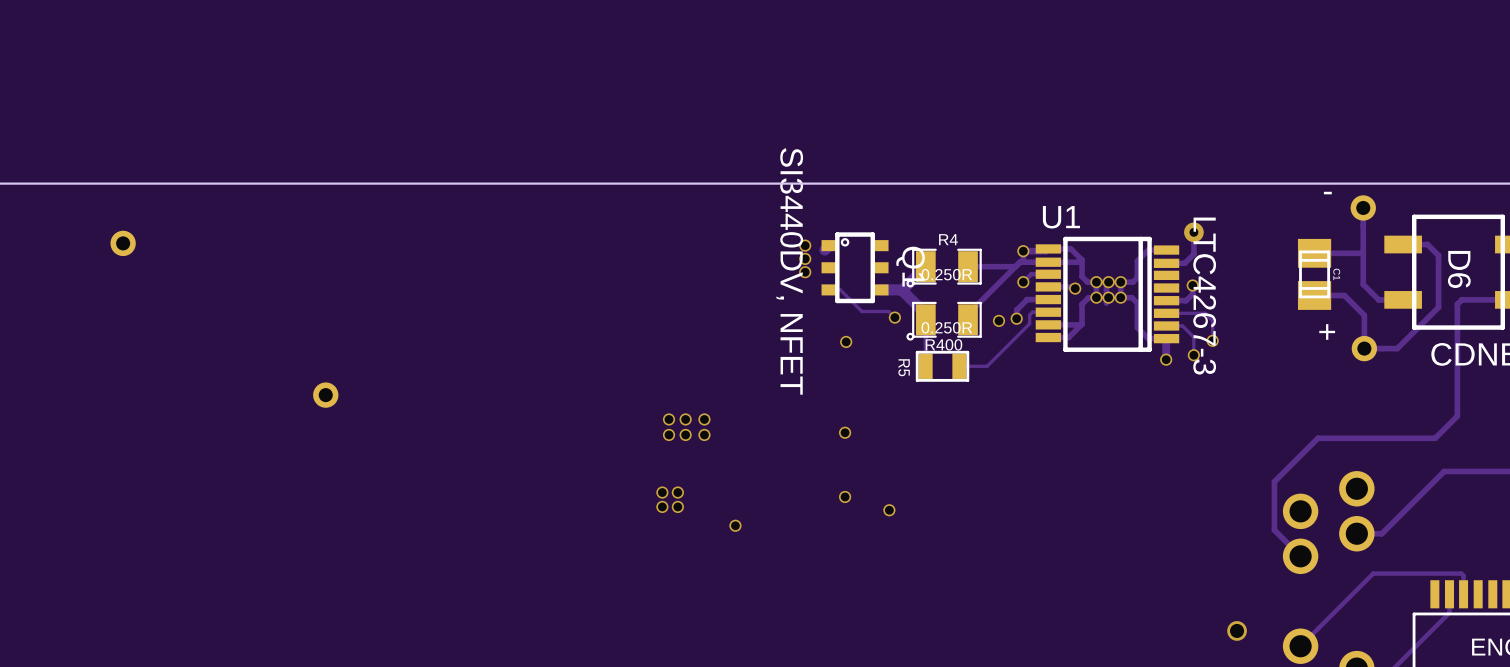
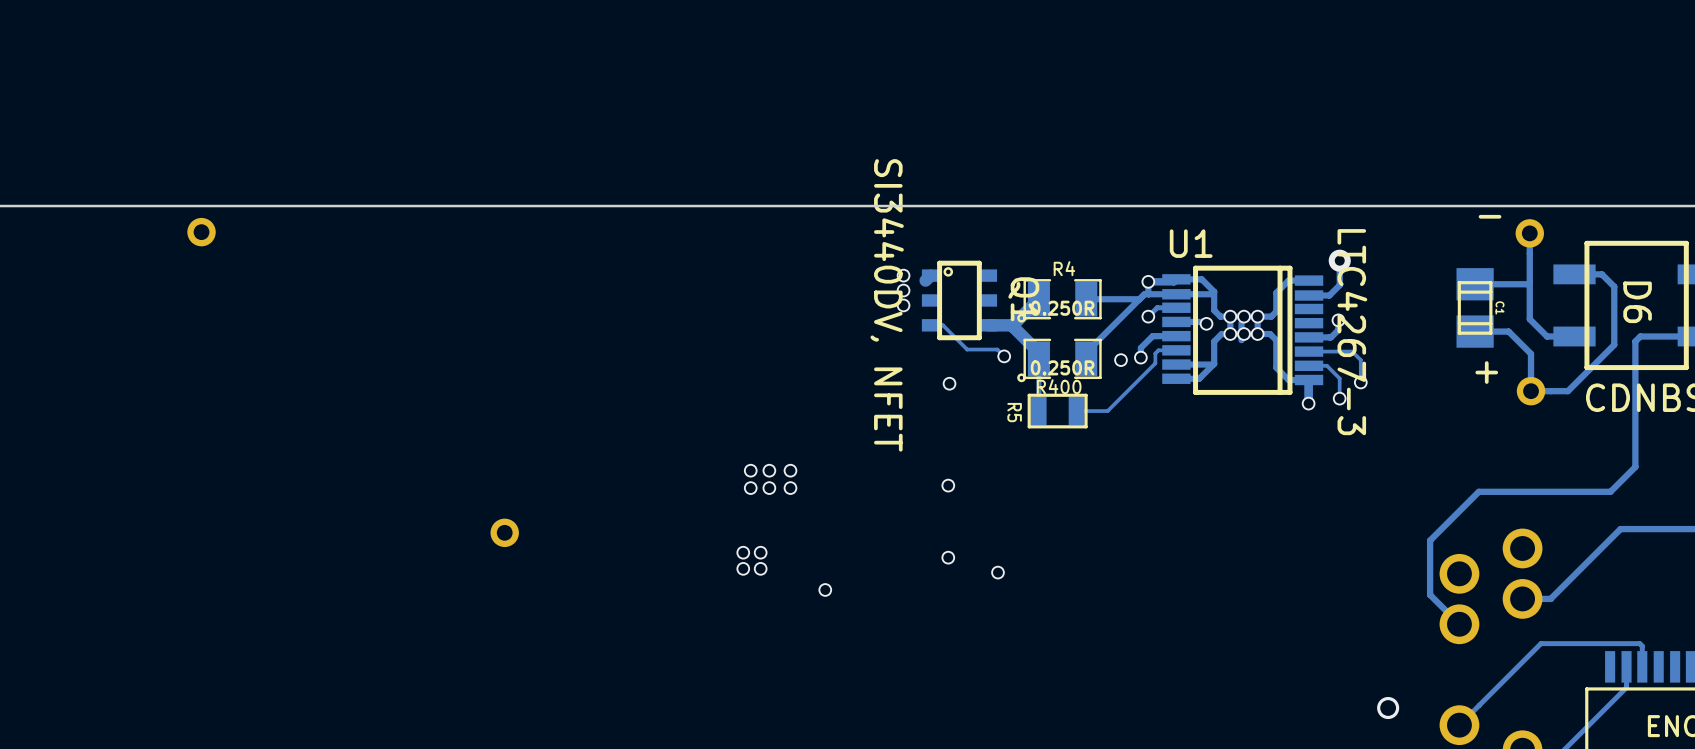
part position: (123, 243) -> (201, 232)
part: (325, 395) -> none
part: none -> (504, 532)

